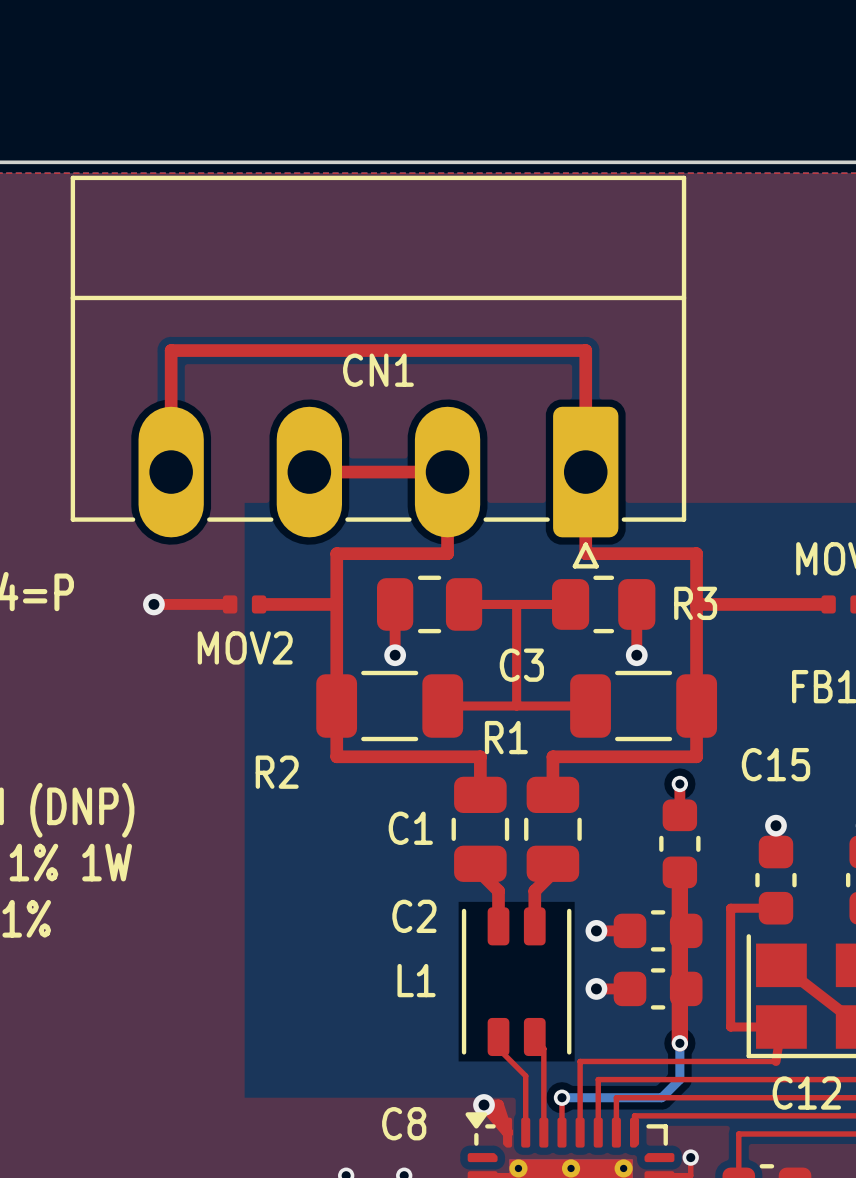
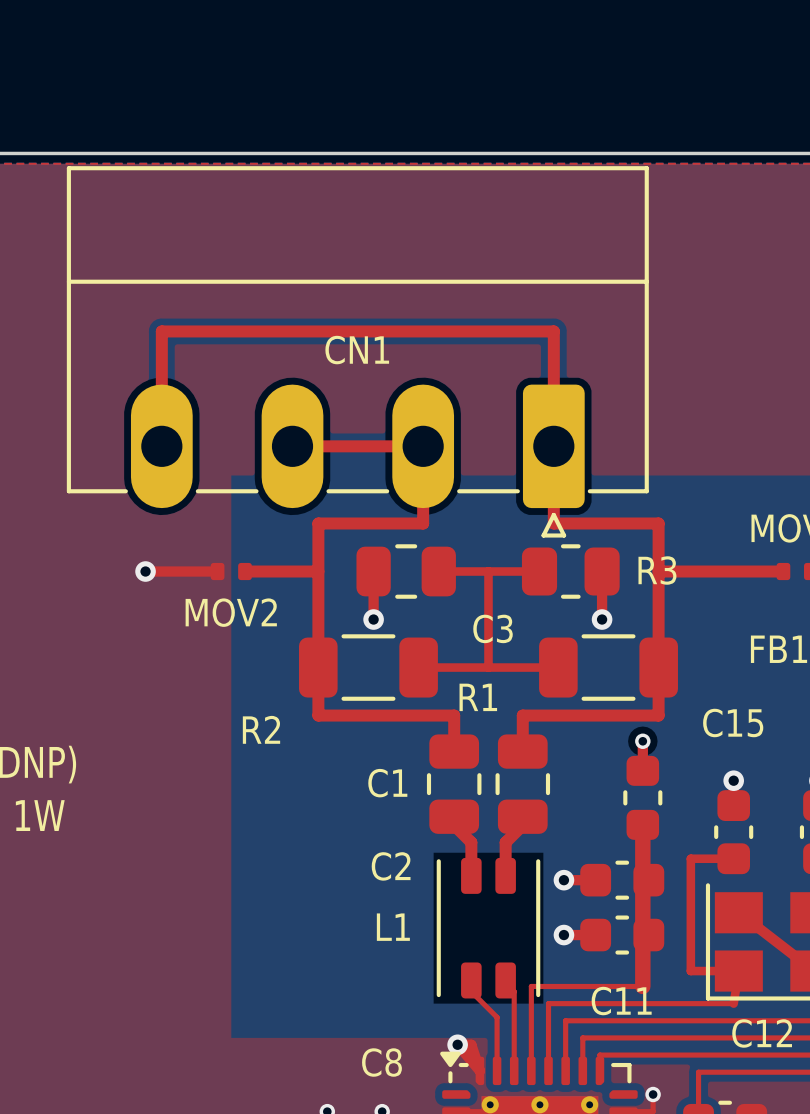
top track: none -> (642, 986) (531, 986) (531, 1037)
bottom track: (679, 1043) (679, 1079) (661, 1097) (561, 1097) -> none
via: (679, 1043) -> none
C11 name: none -> C11 (621, 1001)
via: (561, 1097) -> none

